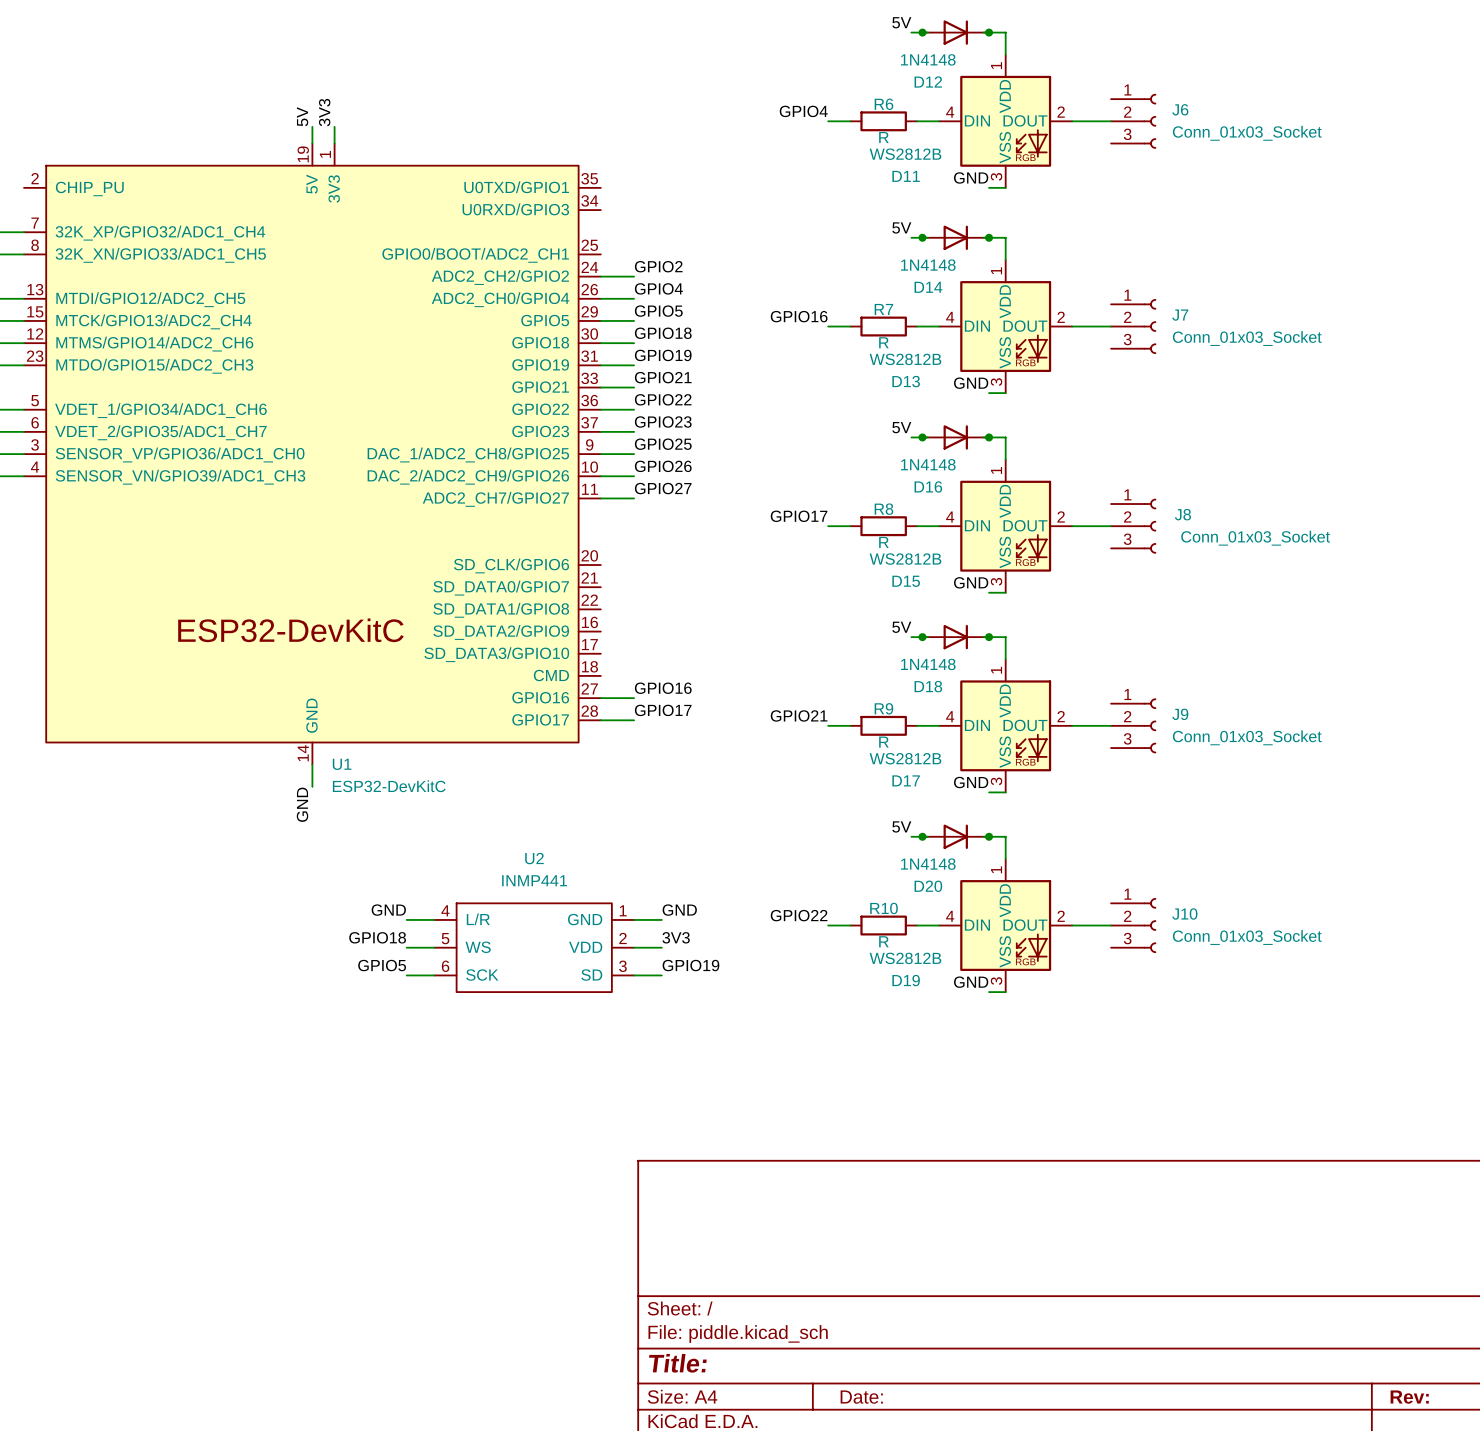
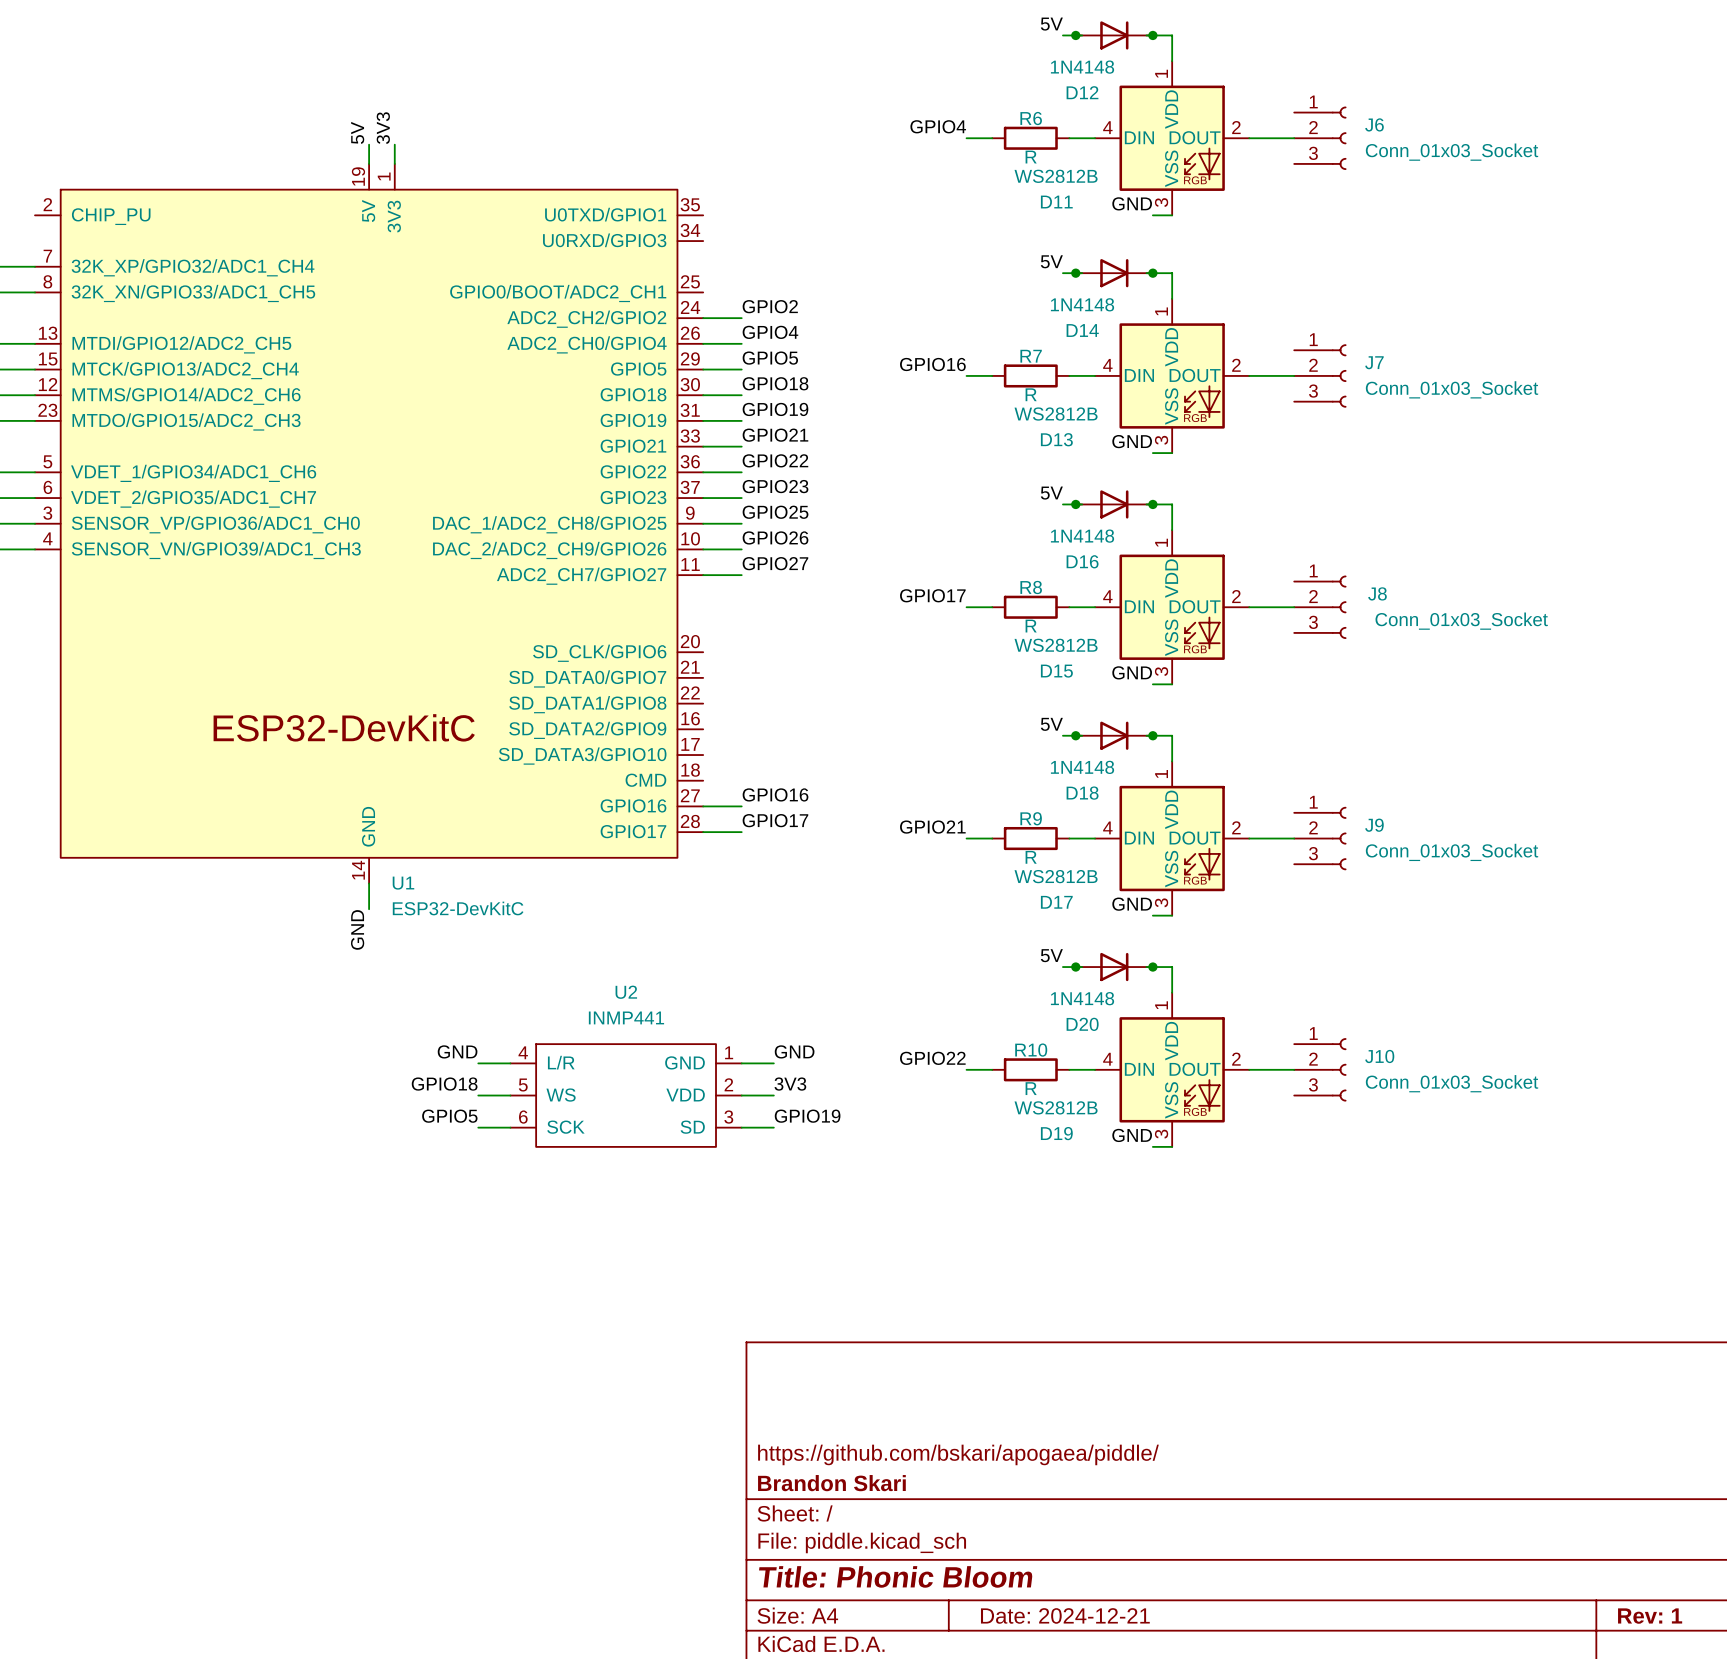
title block: none -> https://github.com/bskari/apogaea/piddle/ (958, 1454)
title block: none -> Brandon Skari (831, 1483)
title block: Title: (677, 1363) -> Title: Phonic Bloom (895, 1576)
title block: Date: (861, 1397) -> Date: 2024-12-21 (1065, 1615)
title block: Rev: (1409, 1397) -> Rev: 1 (1650, 1616)

